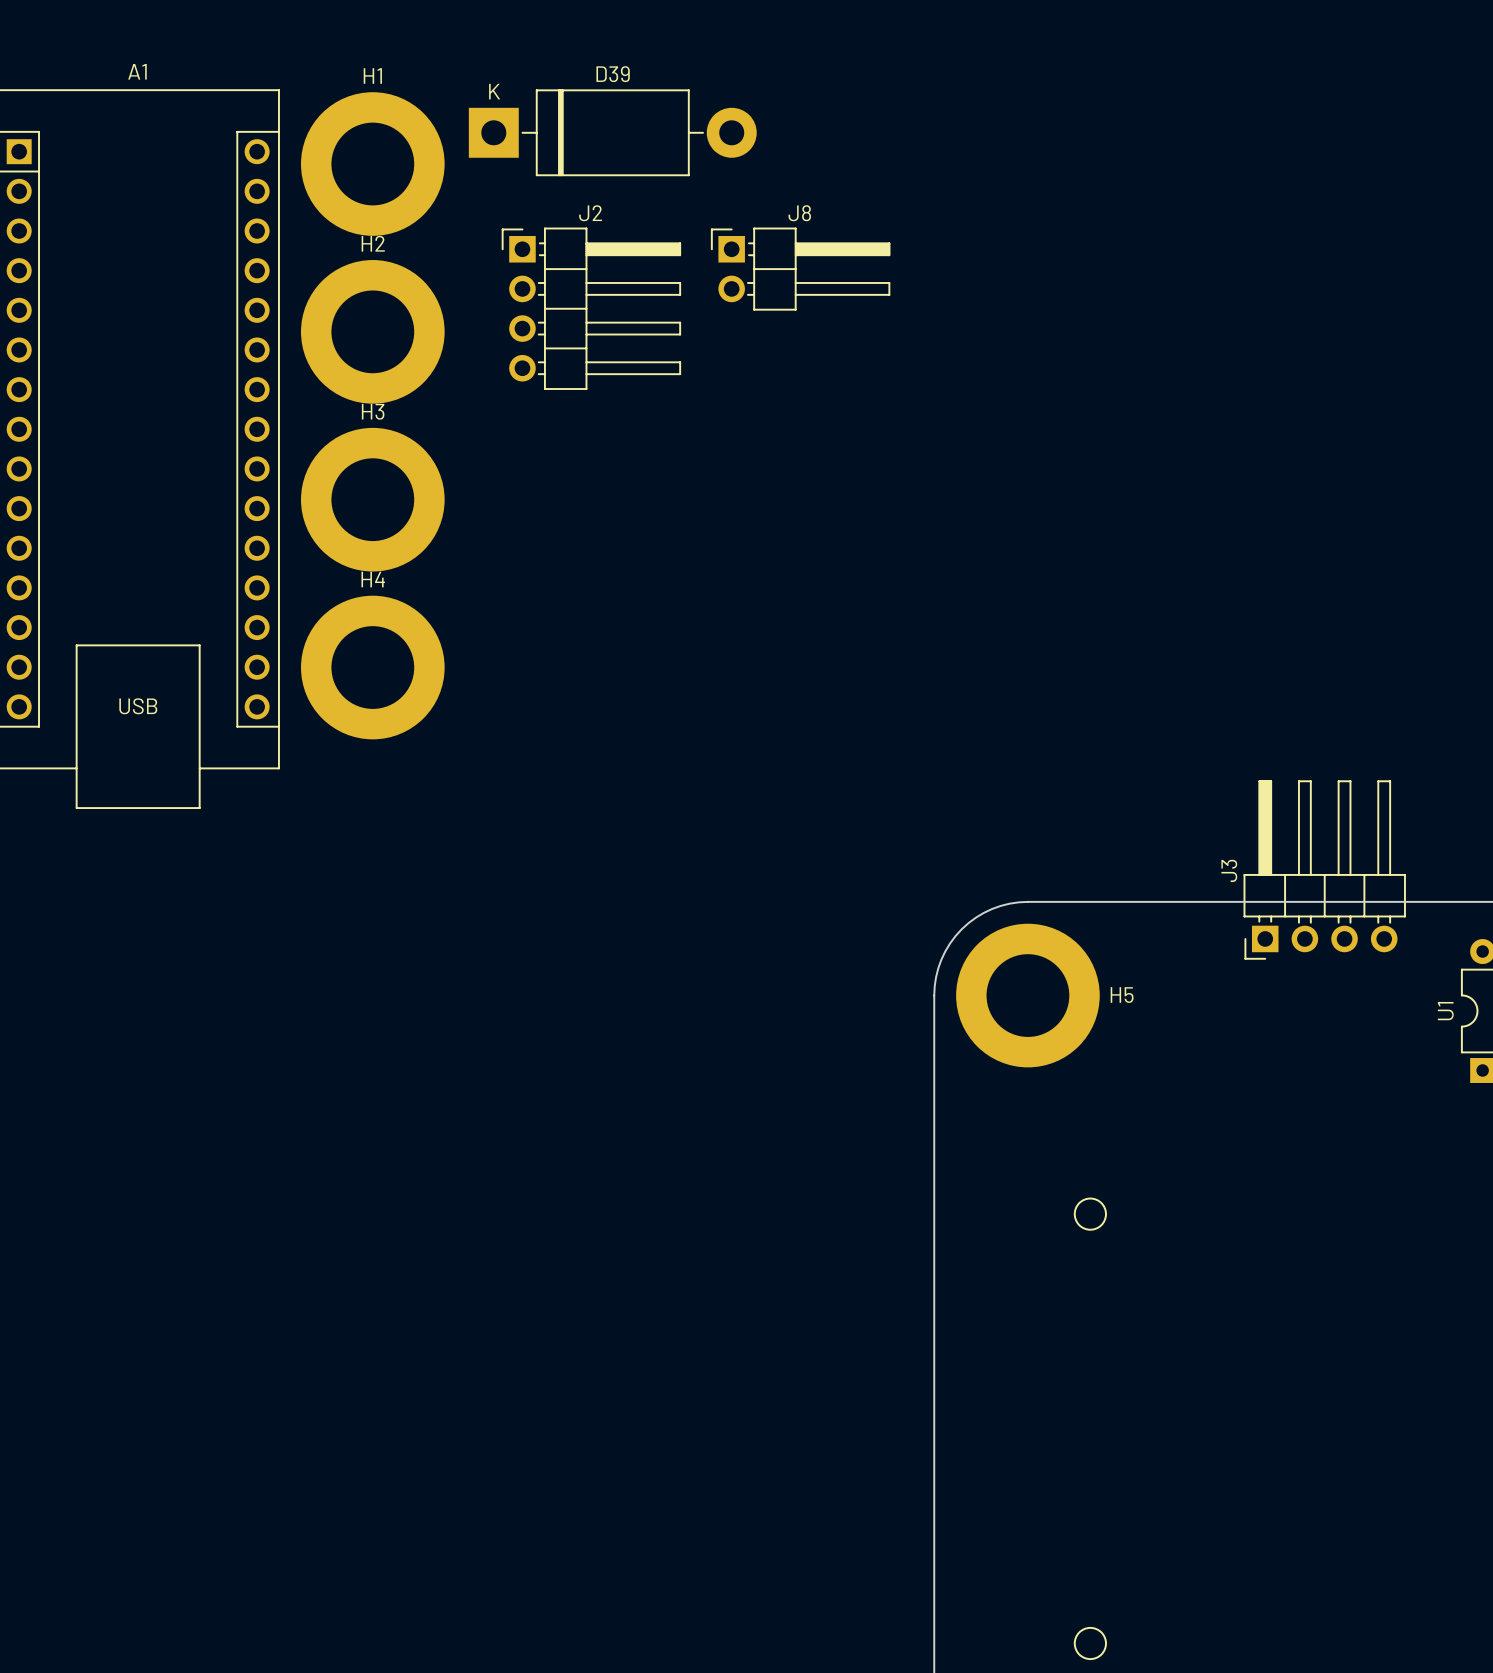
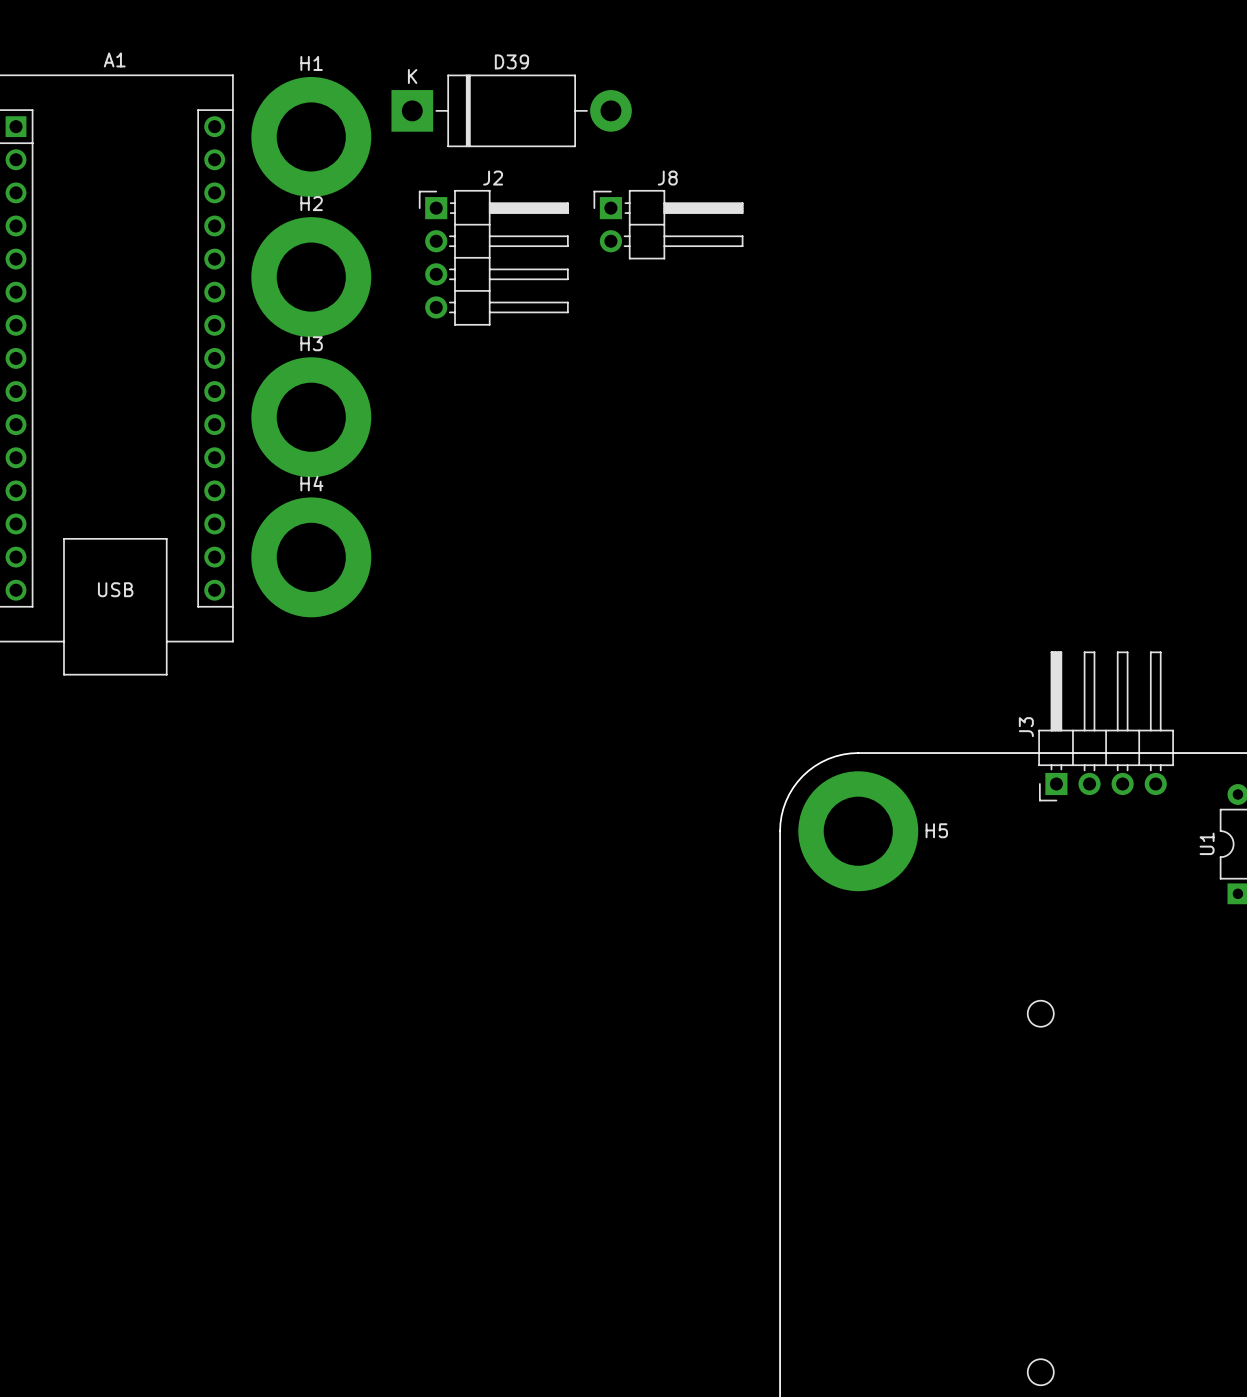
drawing position: (1090, 1214) -> (1040, 1013)
drawing position: (1090, 1643) -> (1040, 1372)

